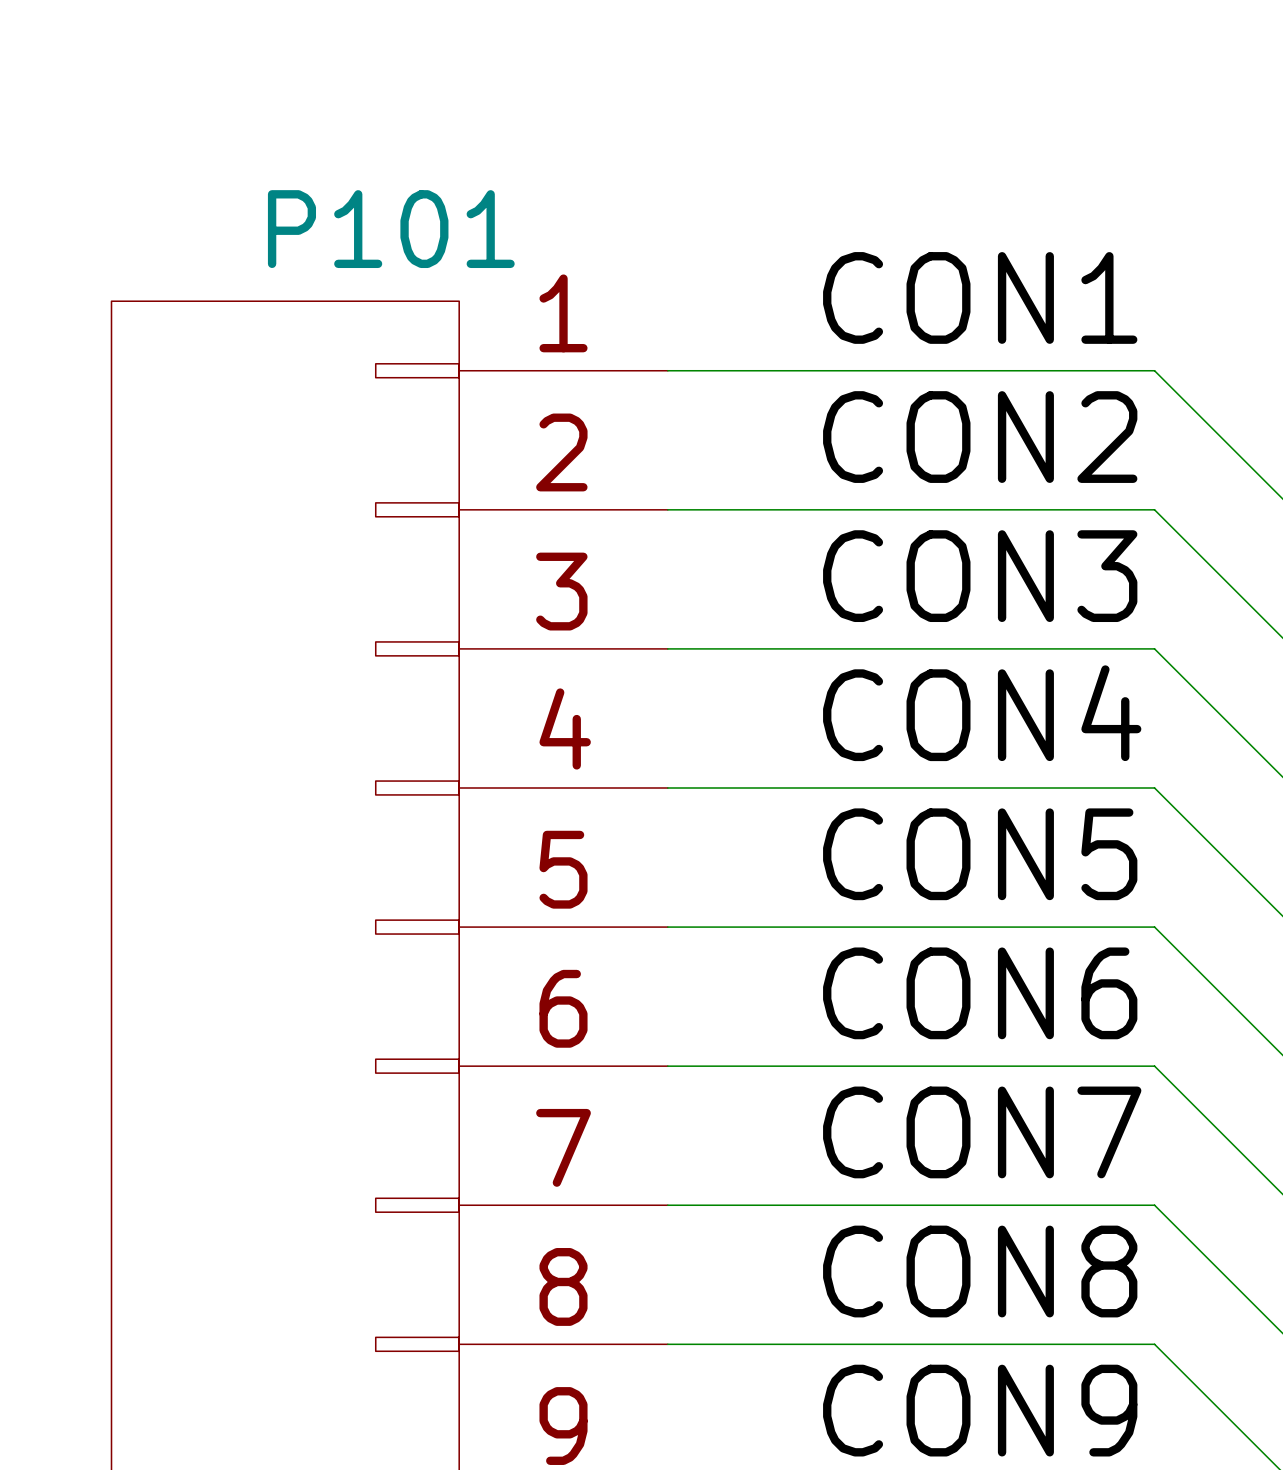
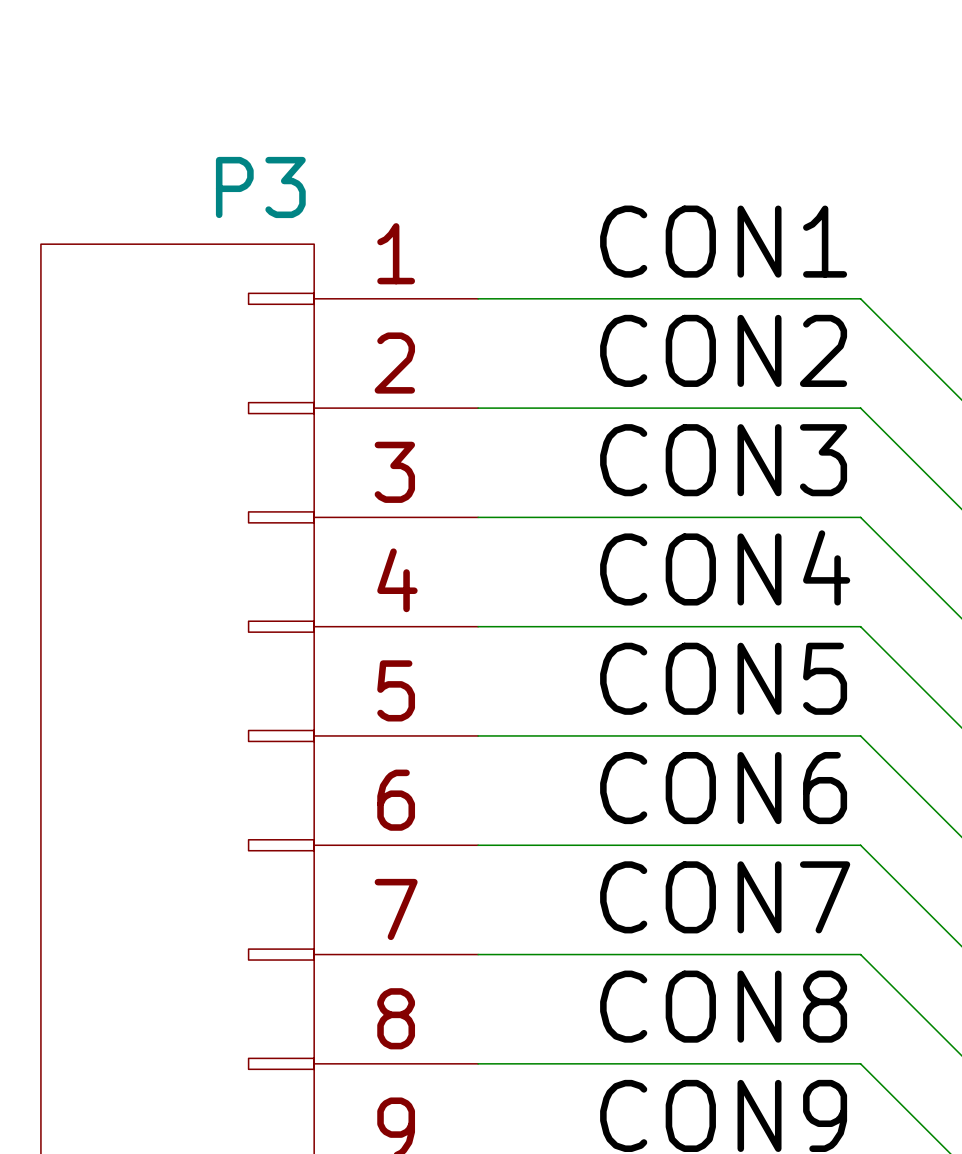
P101 name: P101 (391, 229) -> P3 (260, 187)

